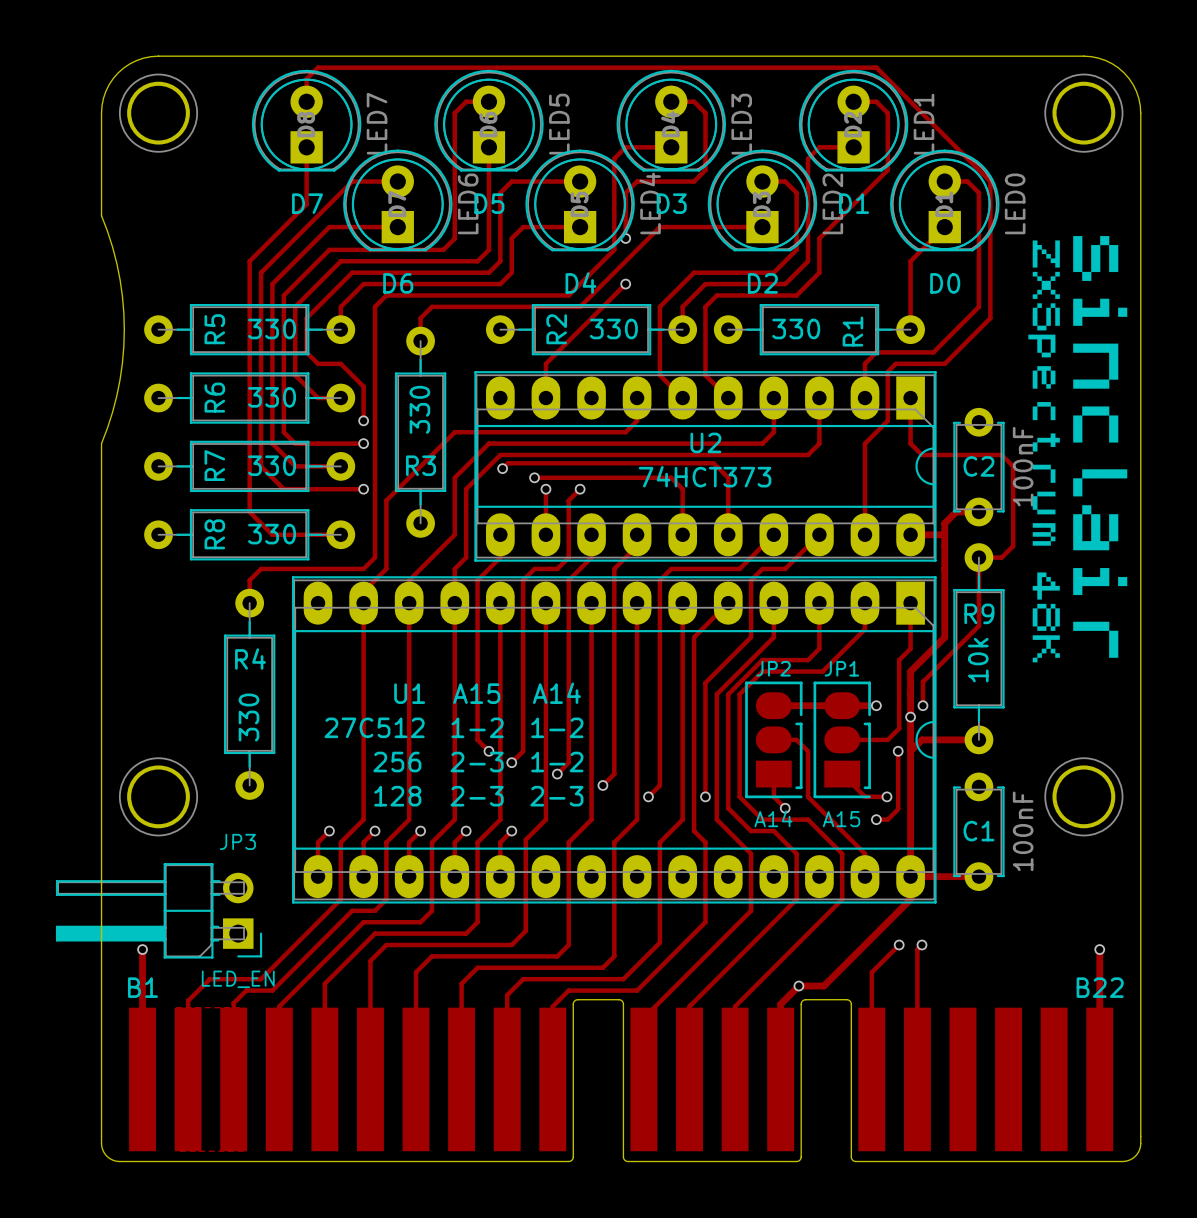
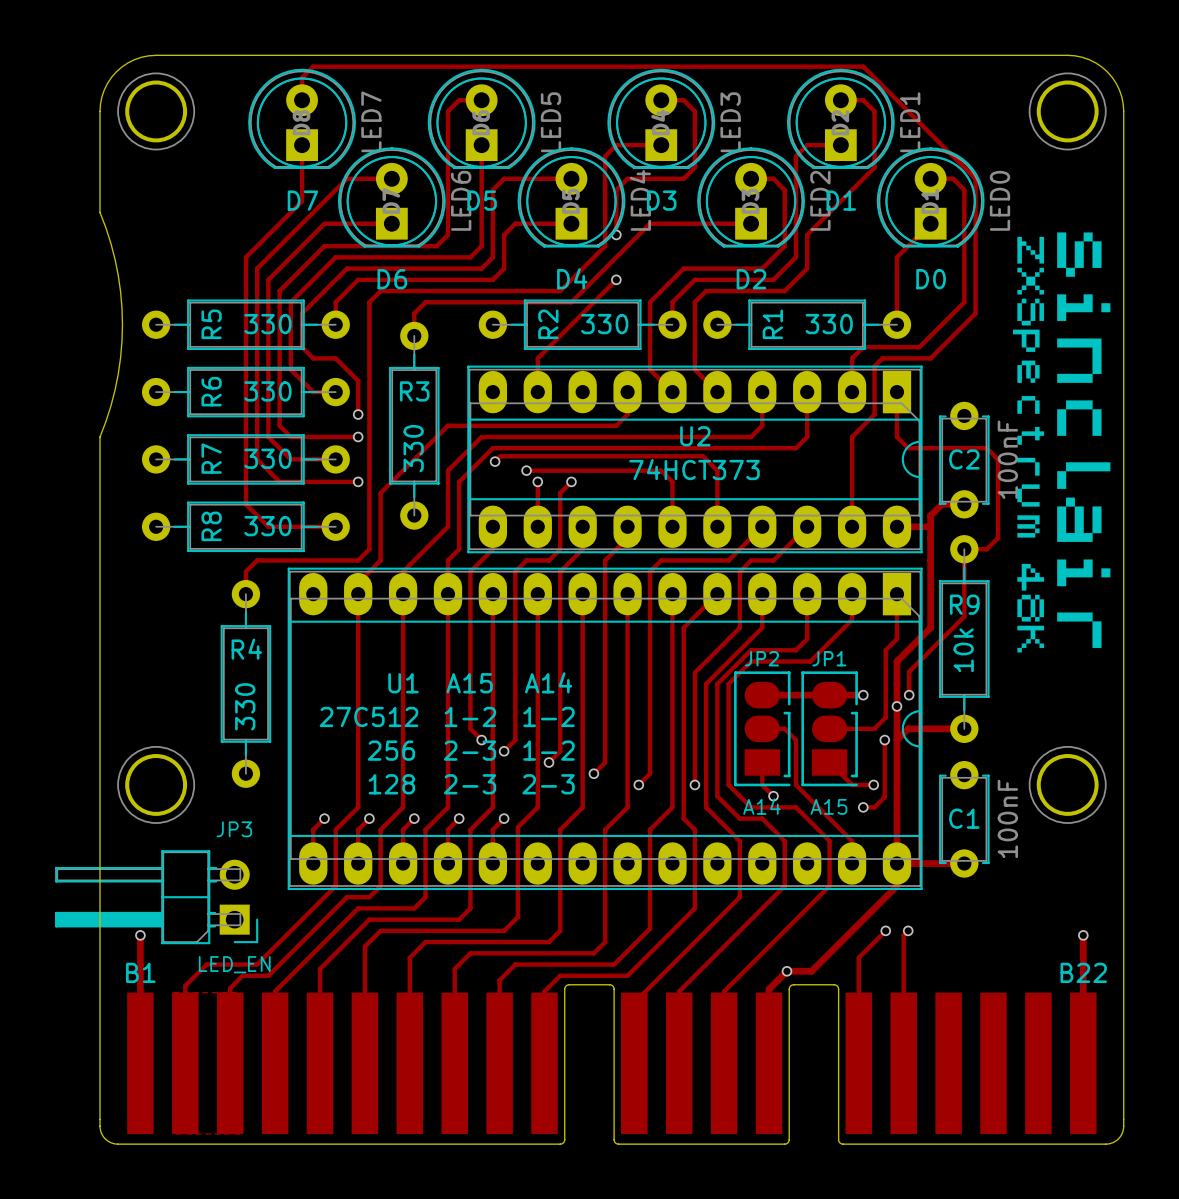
R1 value position: 330 (796, 328) -> 330 (829, 324)
R1 name position: R1 (852, 331) -> R1 (772, 324)
R3 value position: 330 (419, 409) -> 330 (413, 448)
R3 name position: R3 (421, 465) -> R3 (414, 391)

